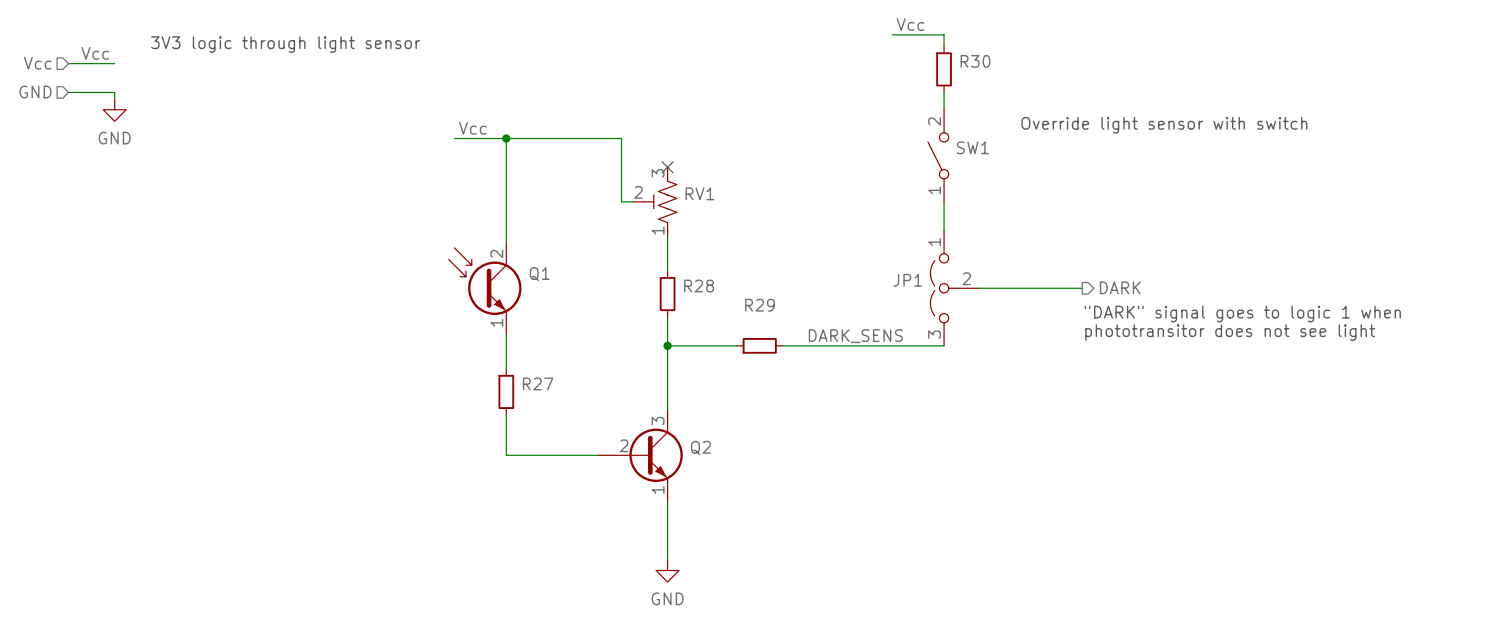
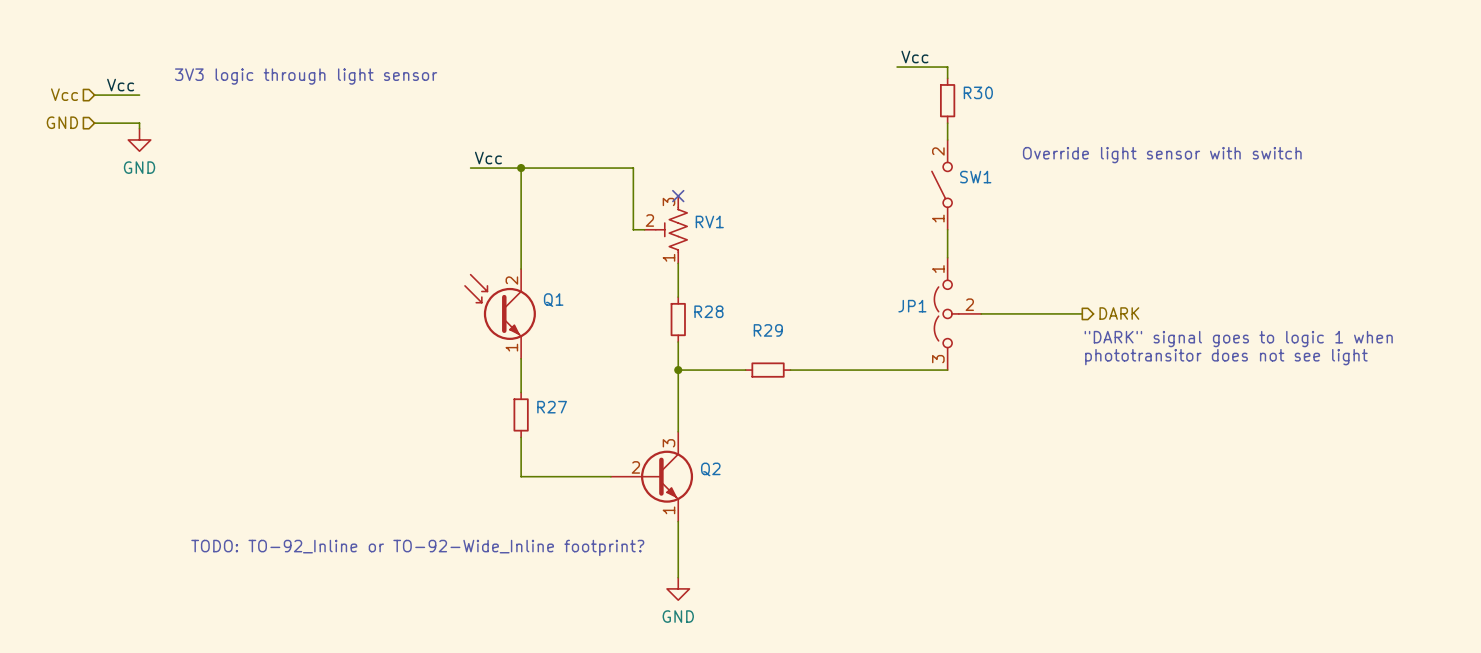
label: DARK_SENS (855, 336) -> none
text: none -> TODO: TO-92_Inline or TO-92-Wide_Inline footprint? (417, 547)

